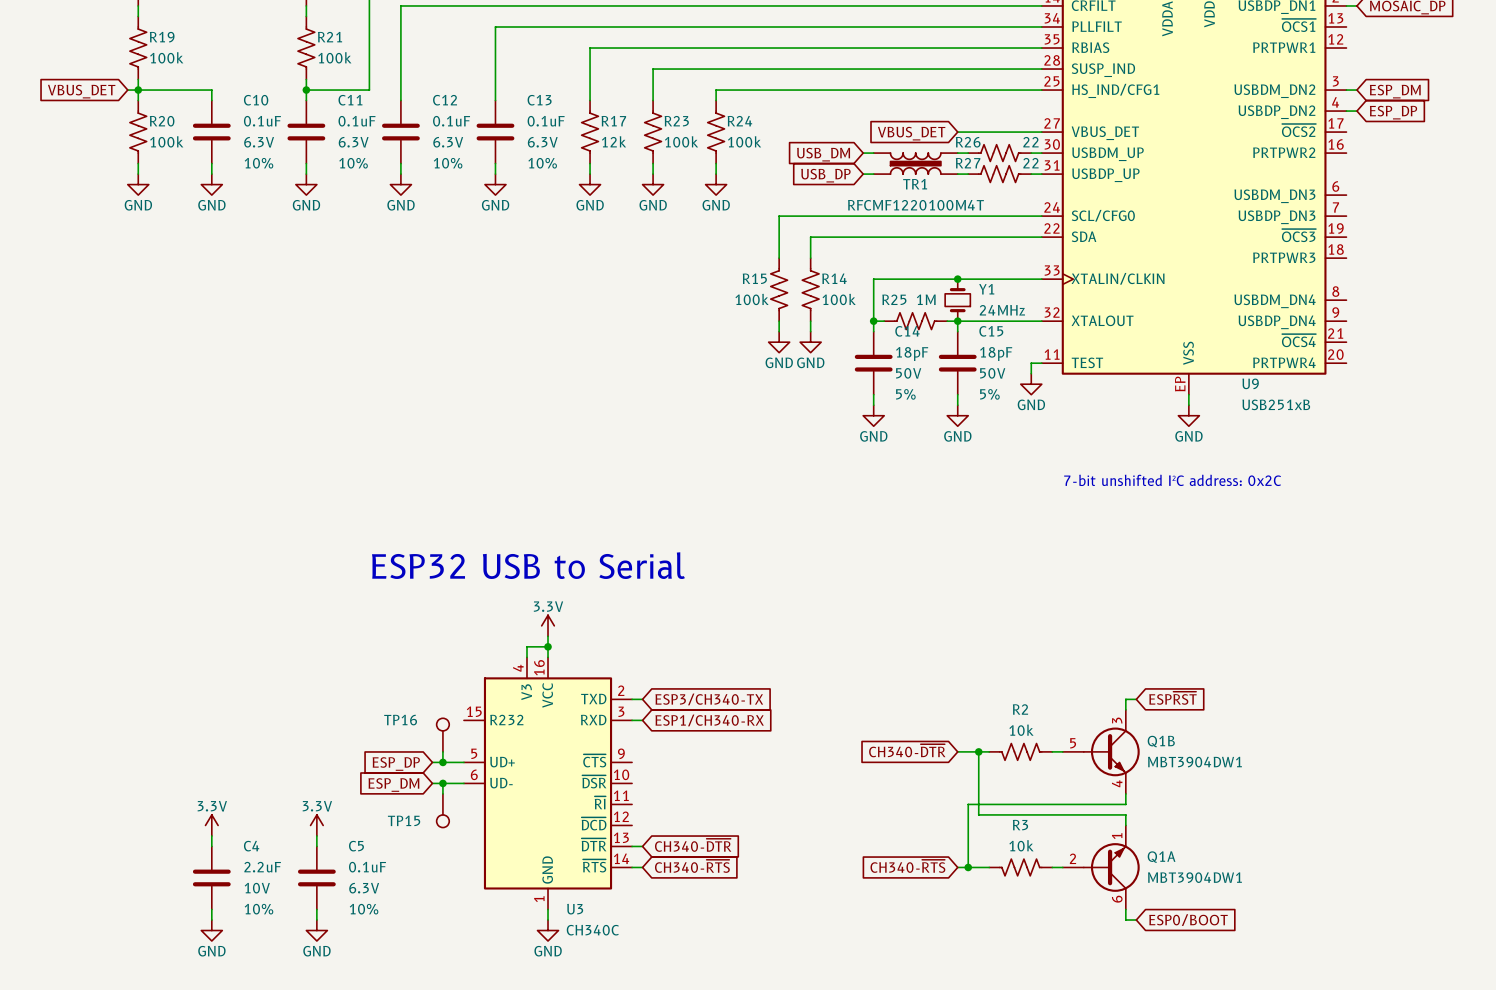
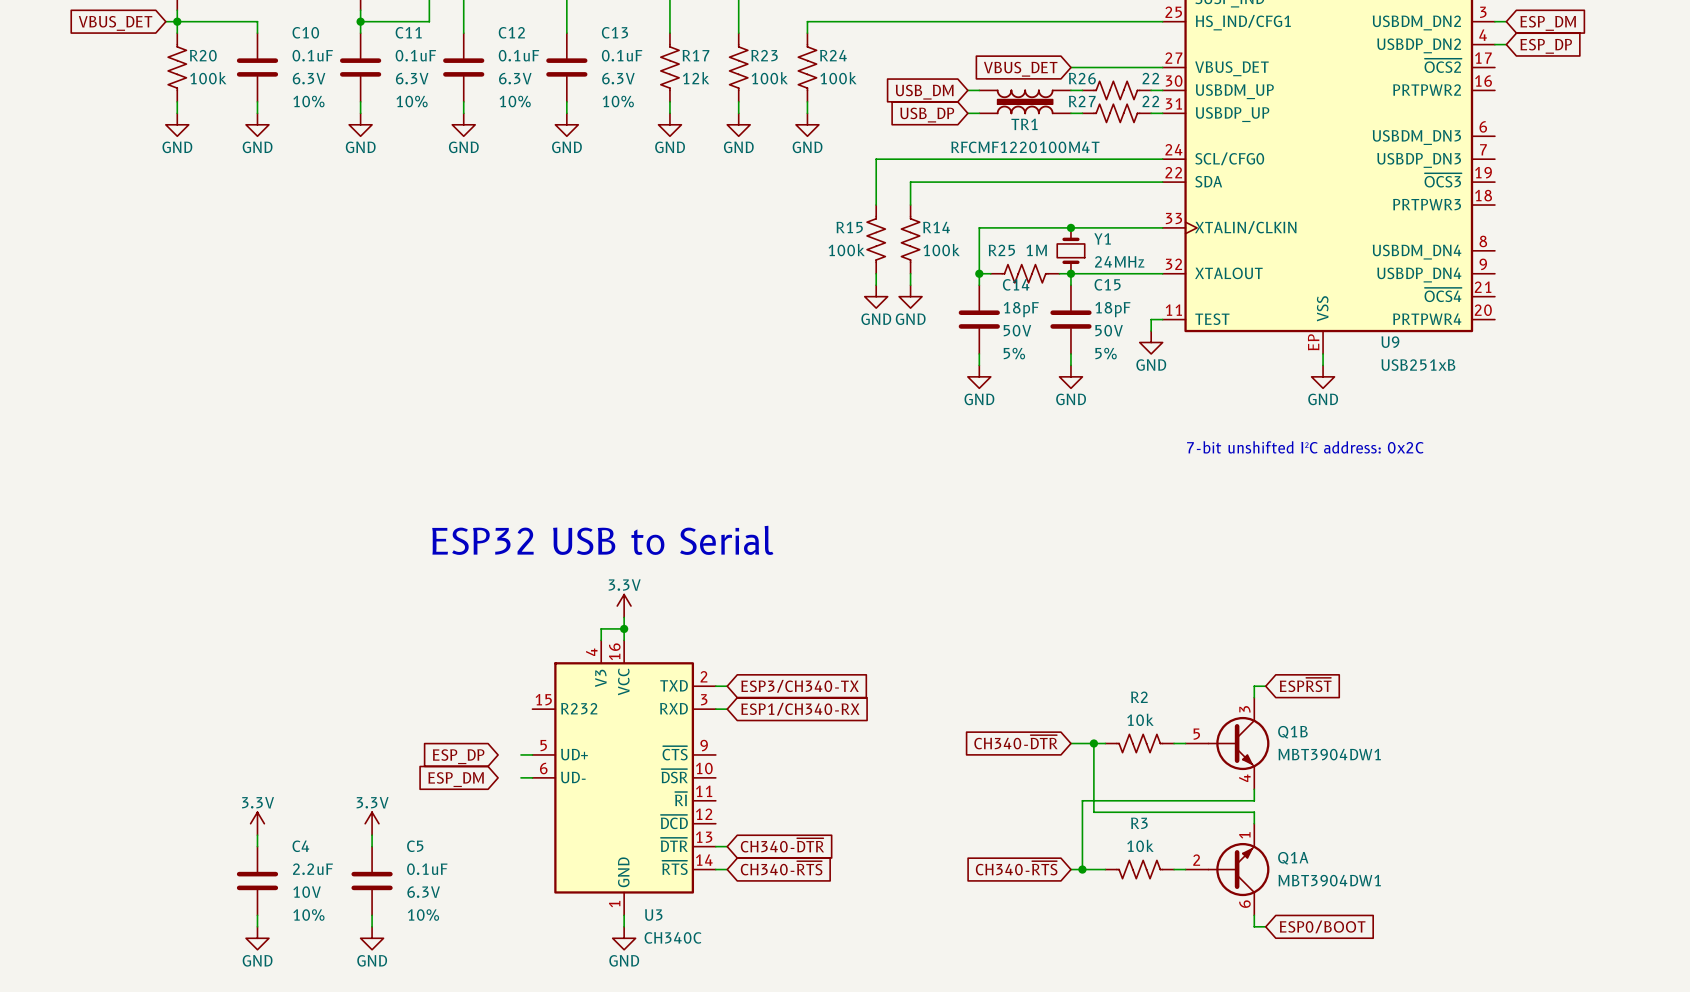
TP16: (442, 735) -> none
wire: (442, 751) (442, 762) -> none
wire: (432, 762) (453, 762) -> none
junction: (442, 762) -> none
wire: (432, 783) (453, 783) -> none
wire: (442, 783) (442, 793) -> none
junction: (442, 783) -> none
TP15: (442, 810) -> none

